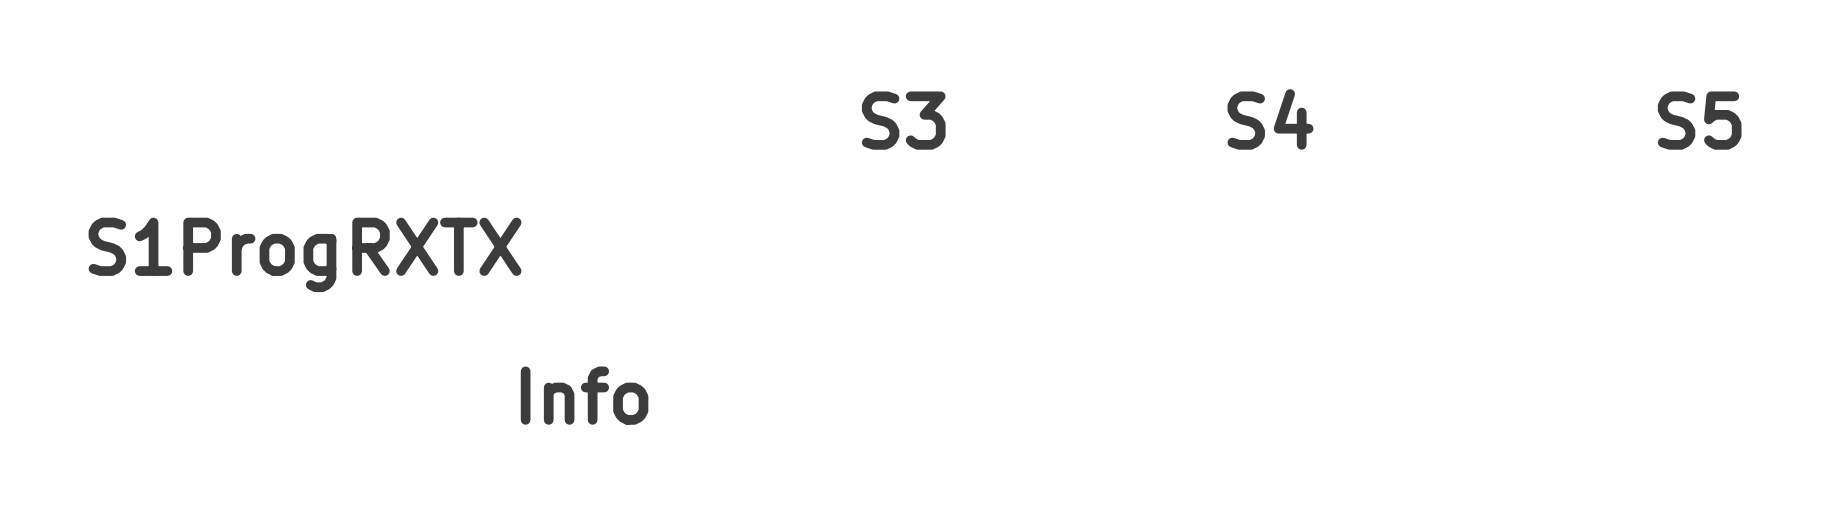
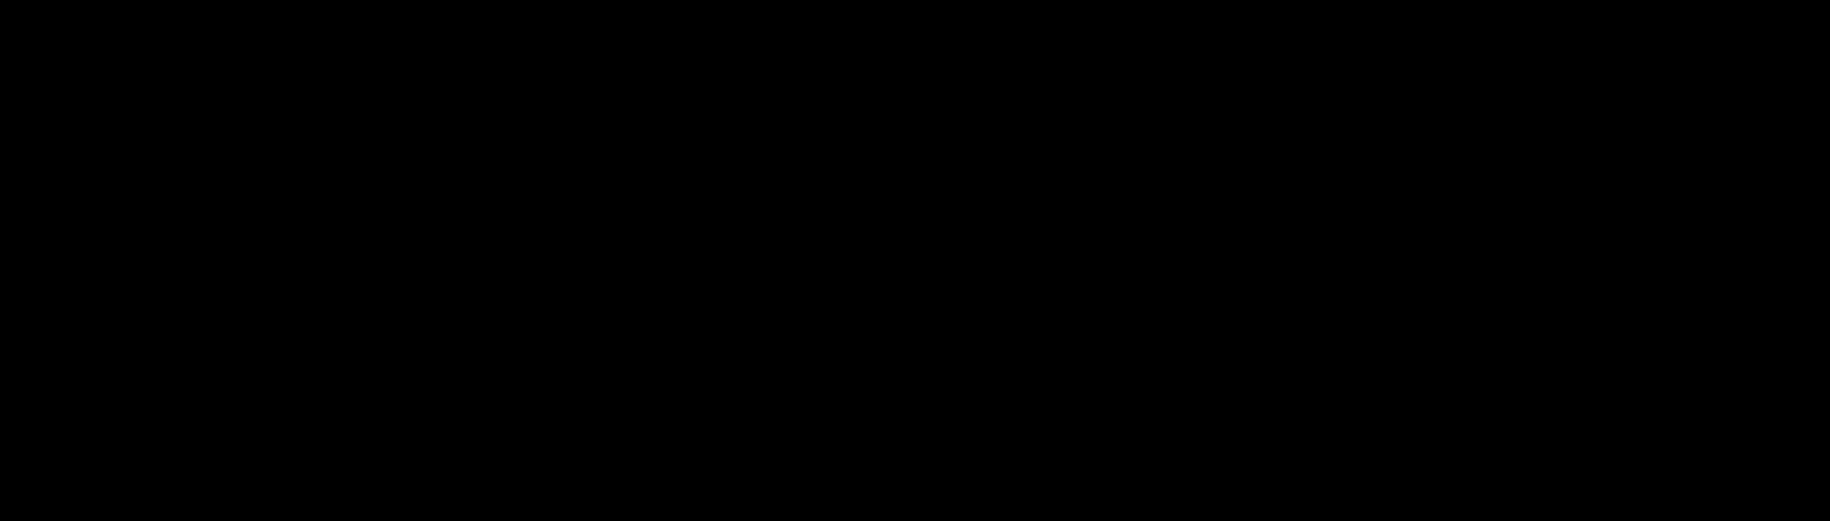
text: S4 (1270, 119) -> none
text: S3 (903, 120) -> none
text: S5 (1699, 120) -> none
text: S1 (130, 246) -> none
text: RXTX (436, 246) -> none
text: Prog (259, 254) -> none
text: Info (584, 395) -> none

